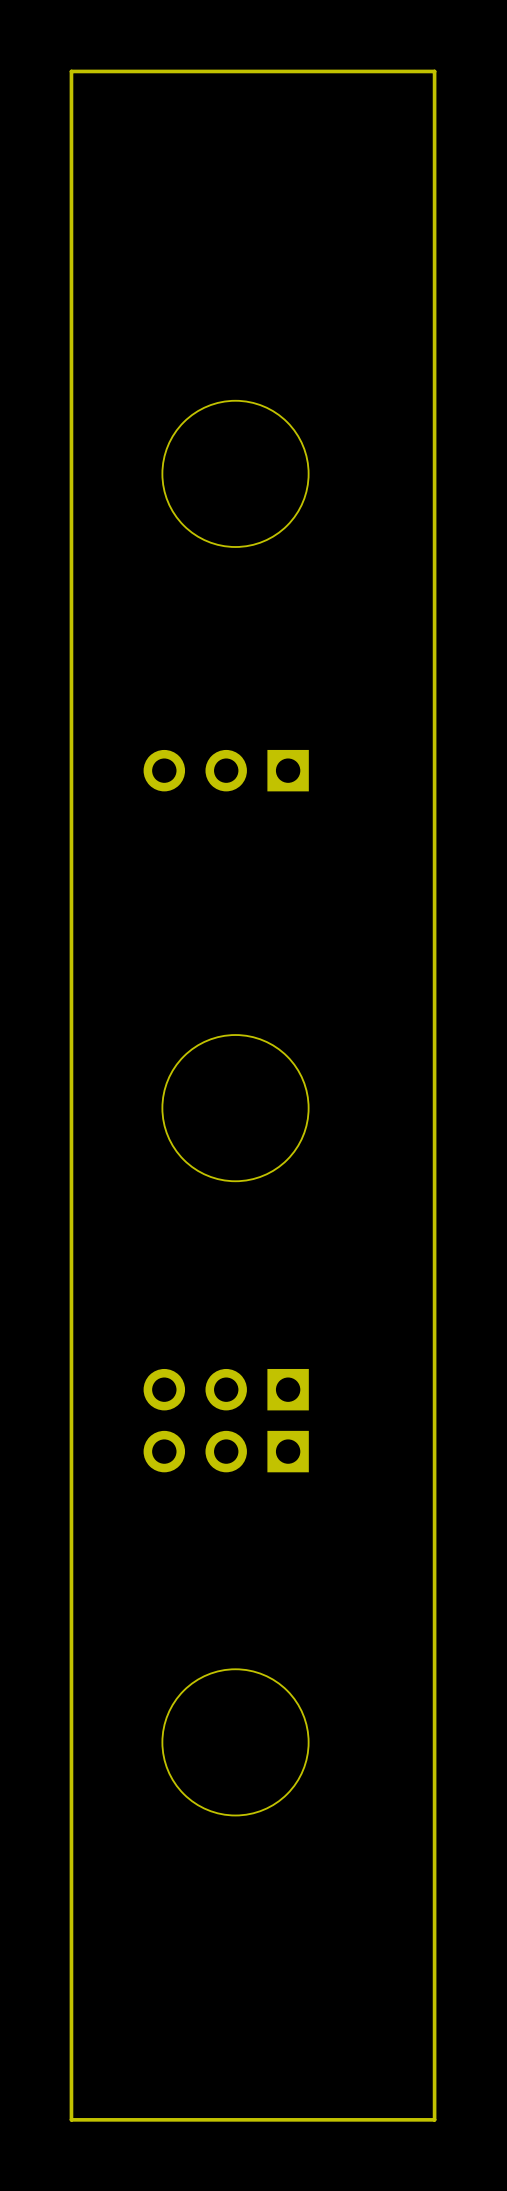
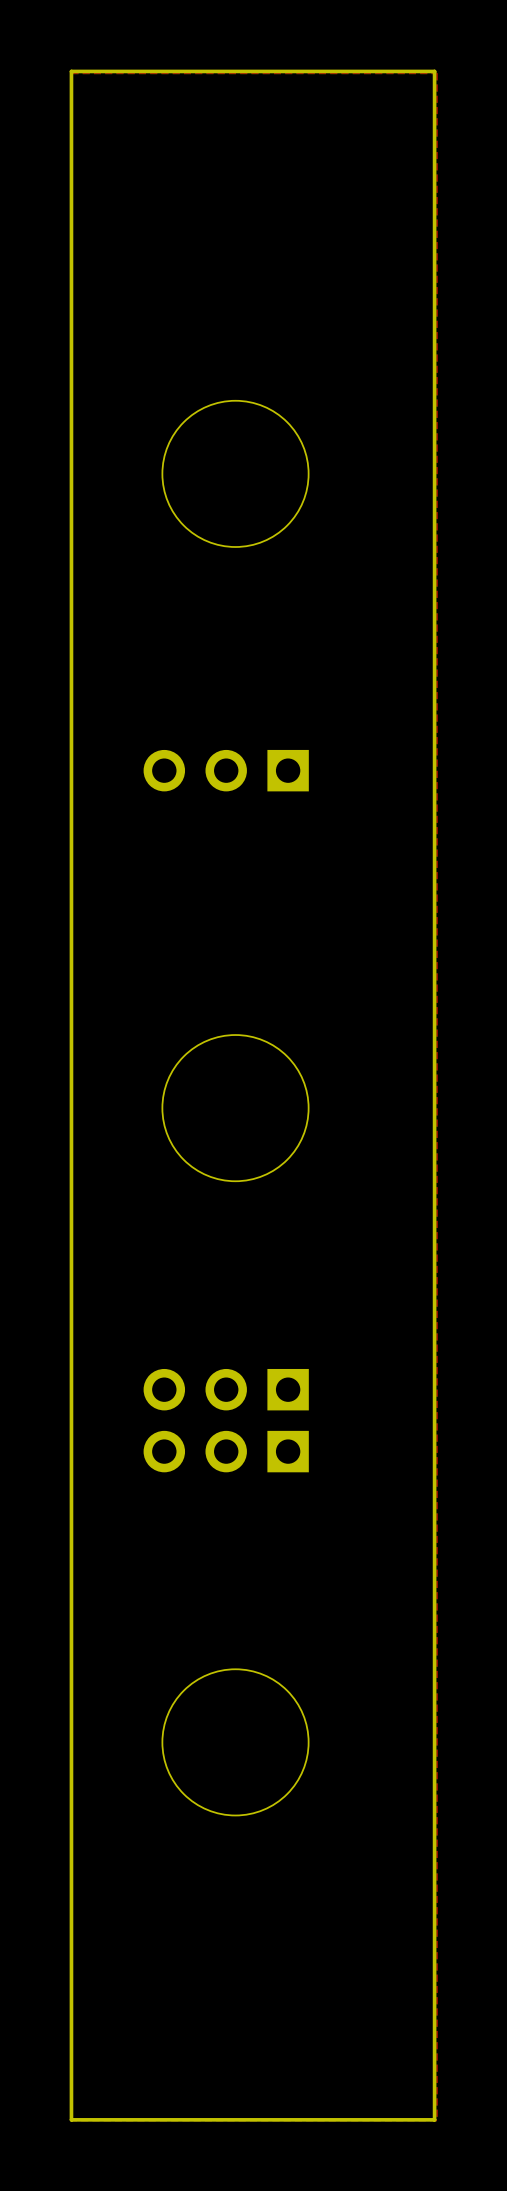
top zone outline: none -> (71, 73) (437, 73) (437, 2120) (71, 2120) (71, 73)

